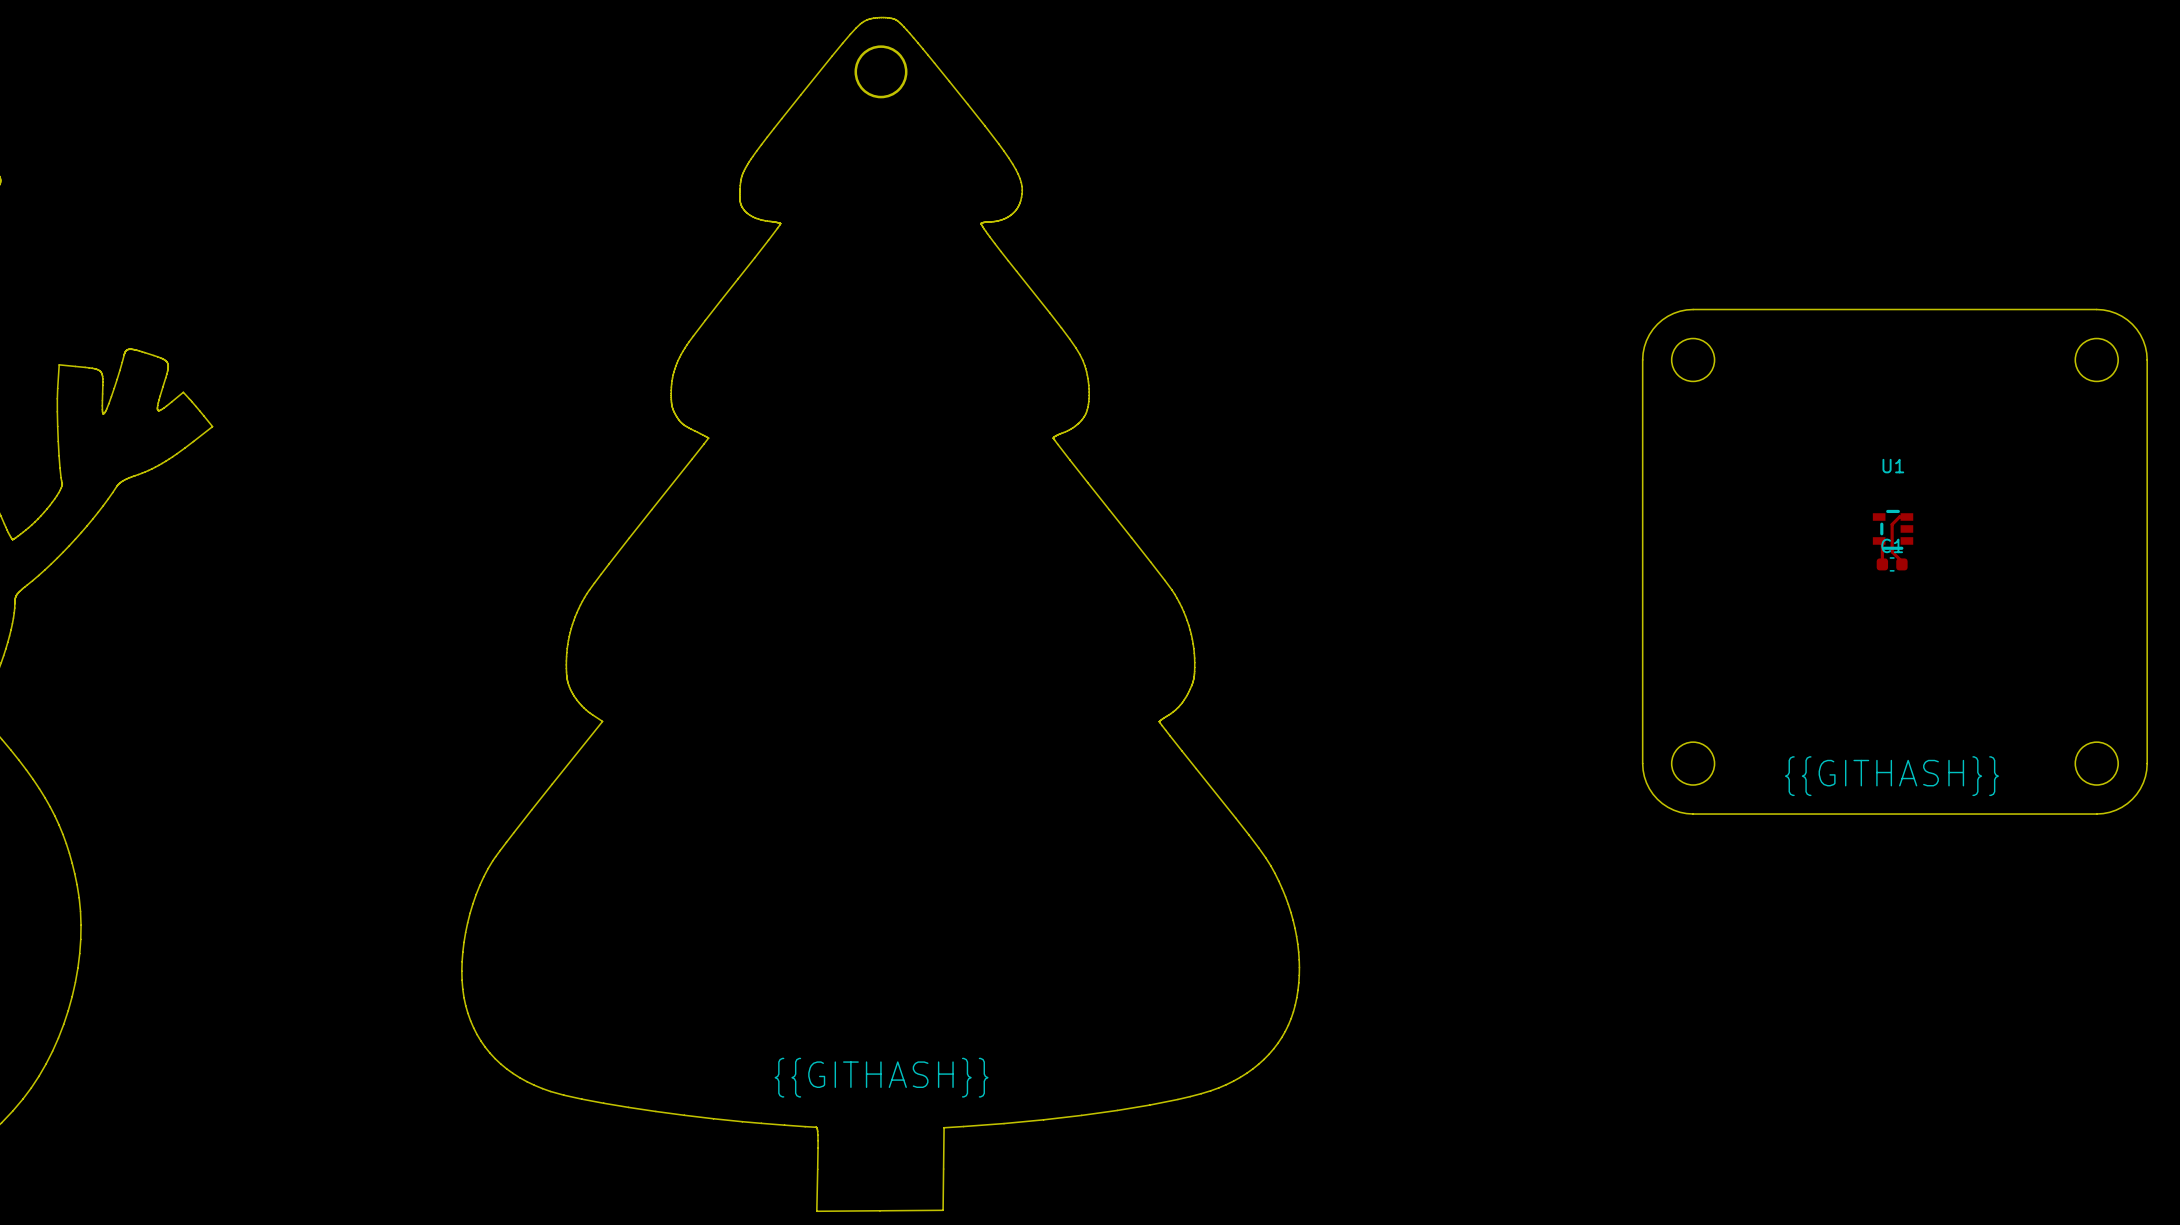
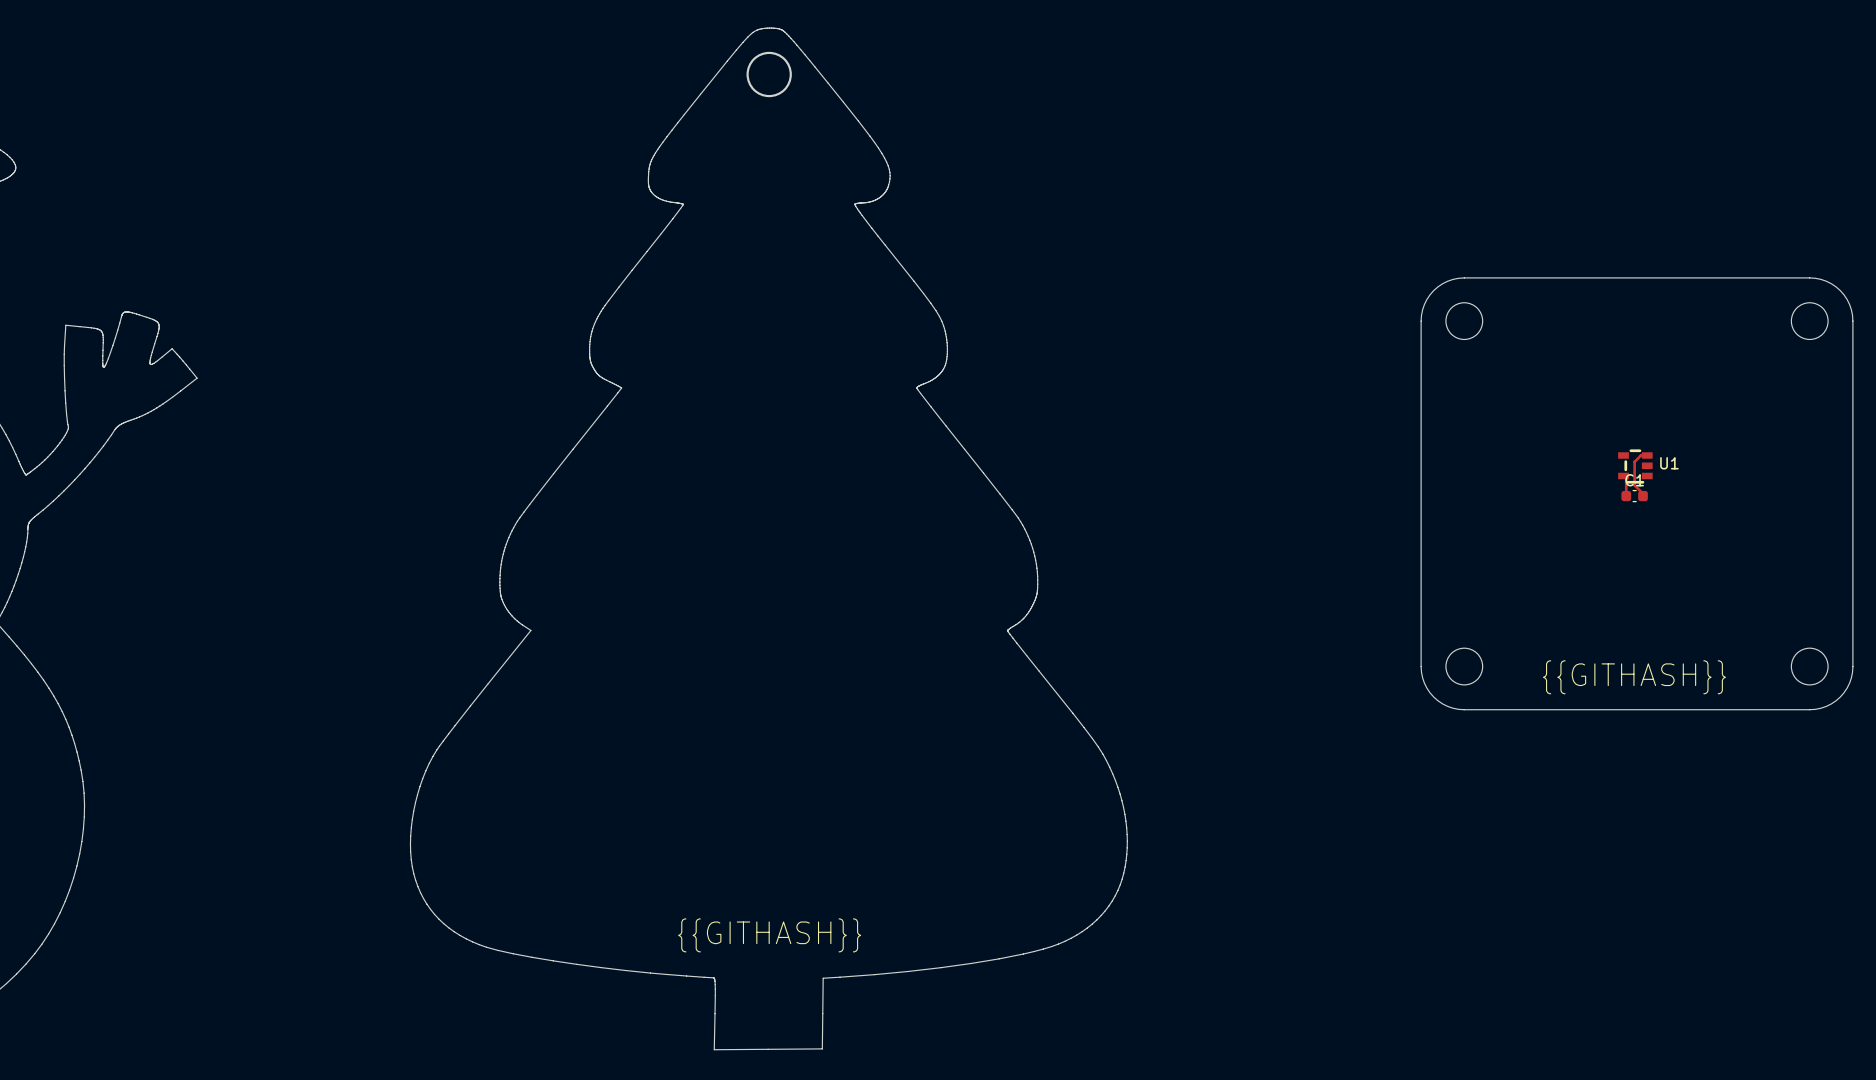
U1 name position: U1 (1893, 466) -> U1 (1669, 463)

